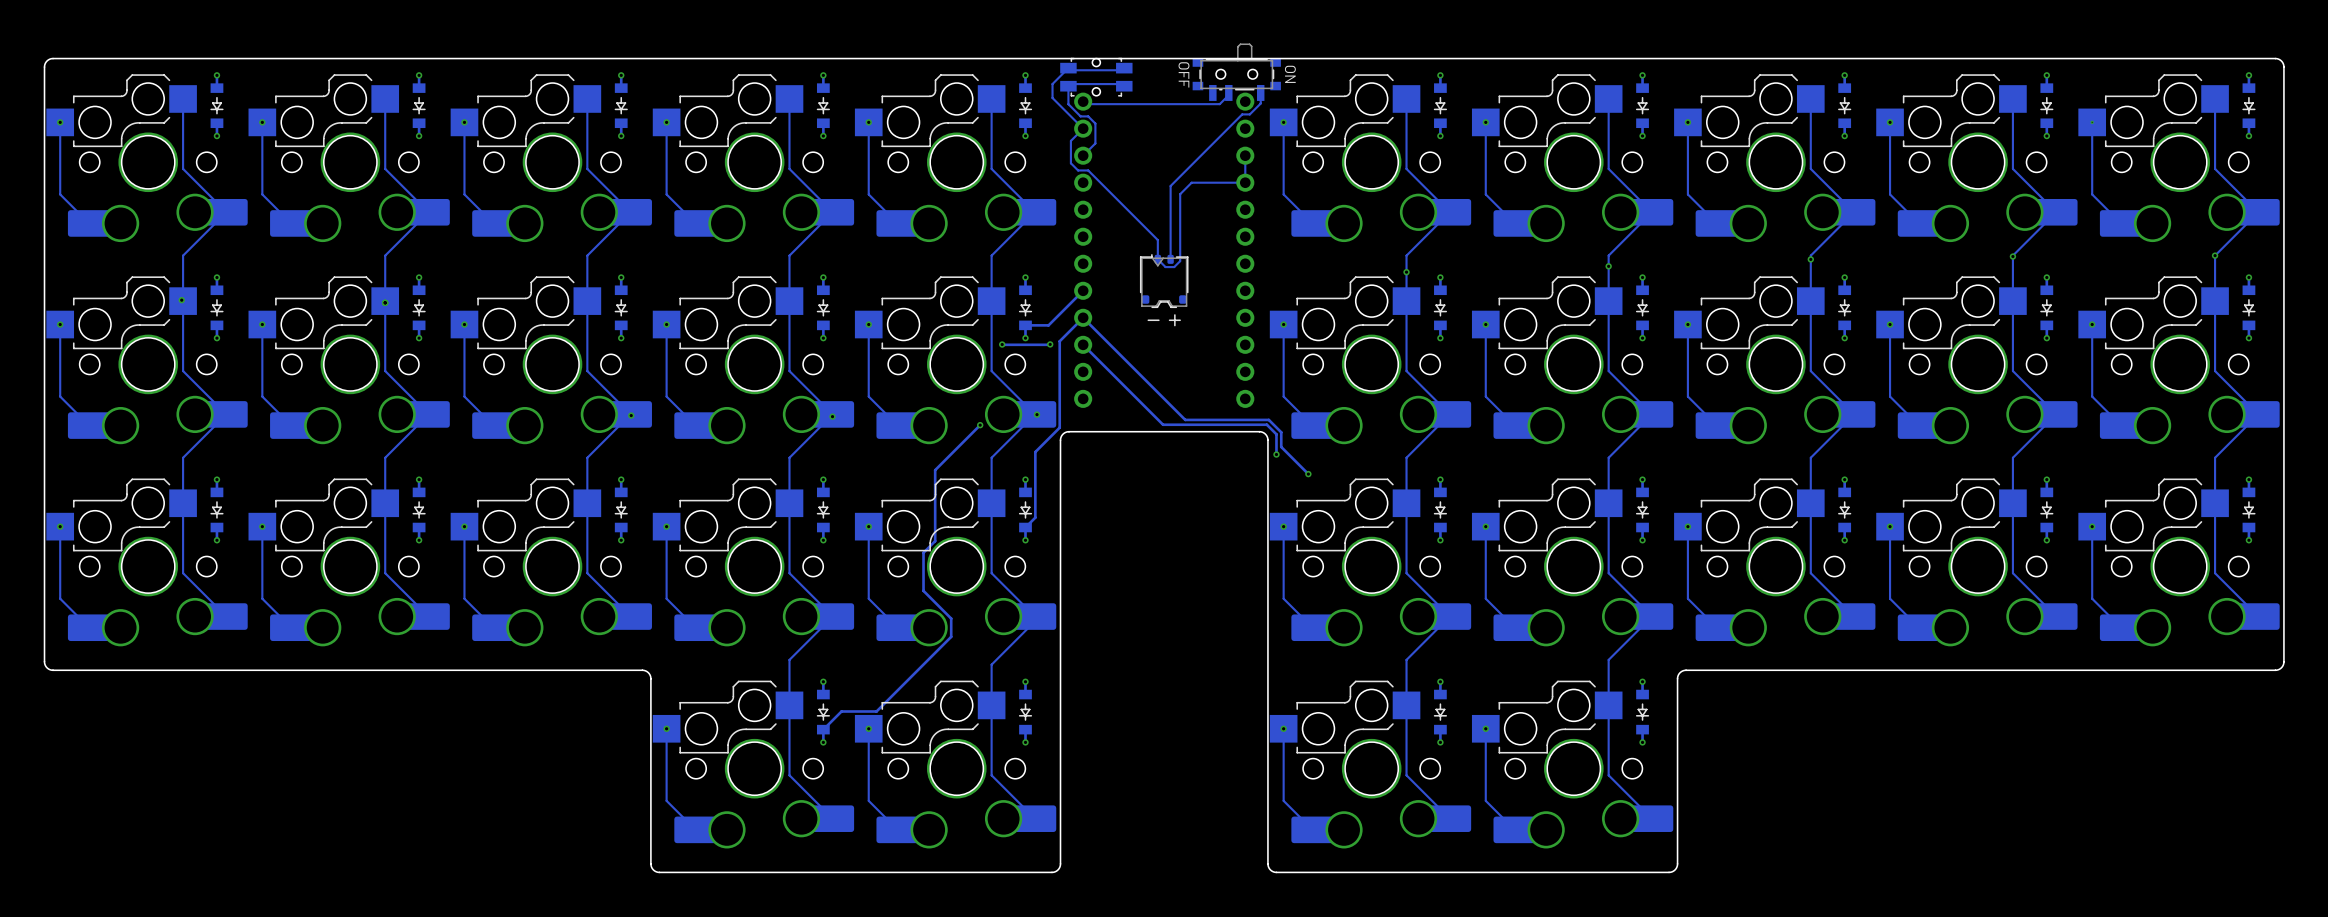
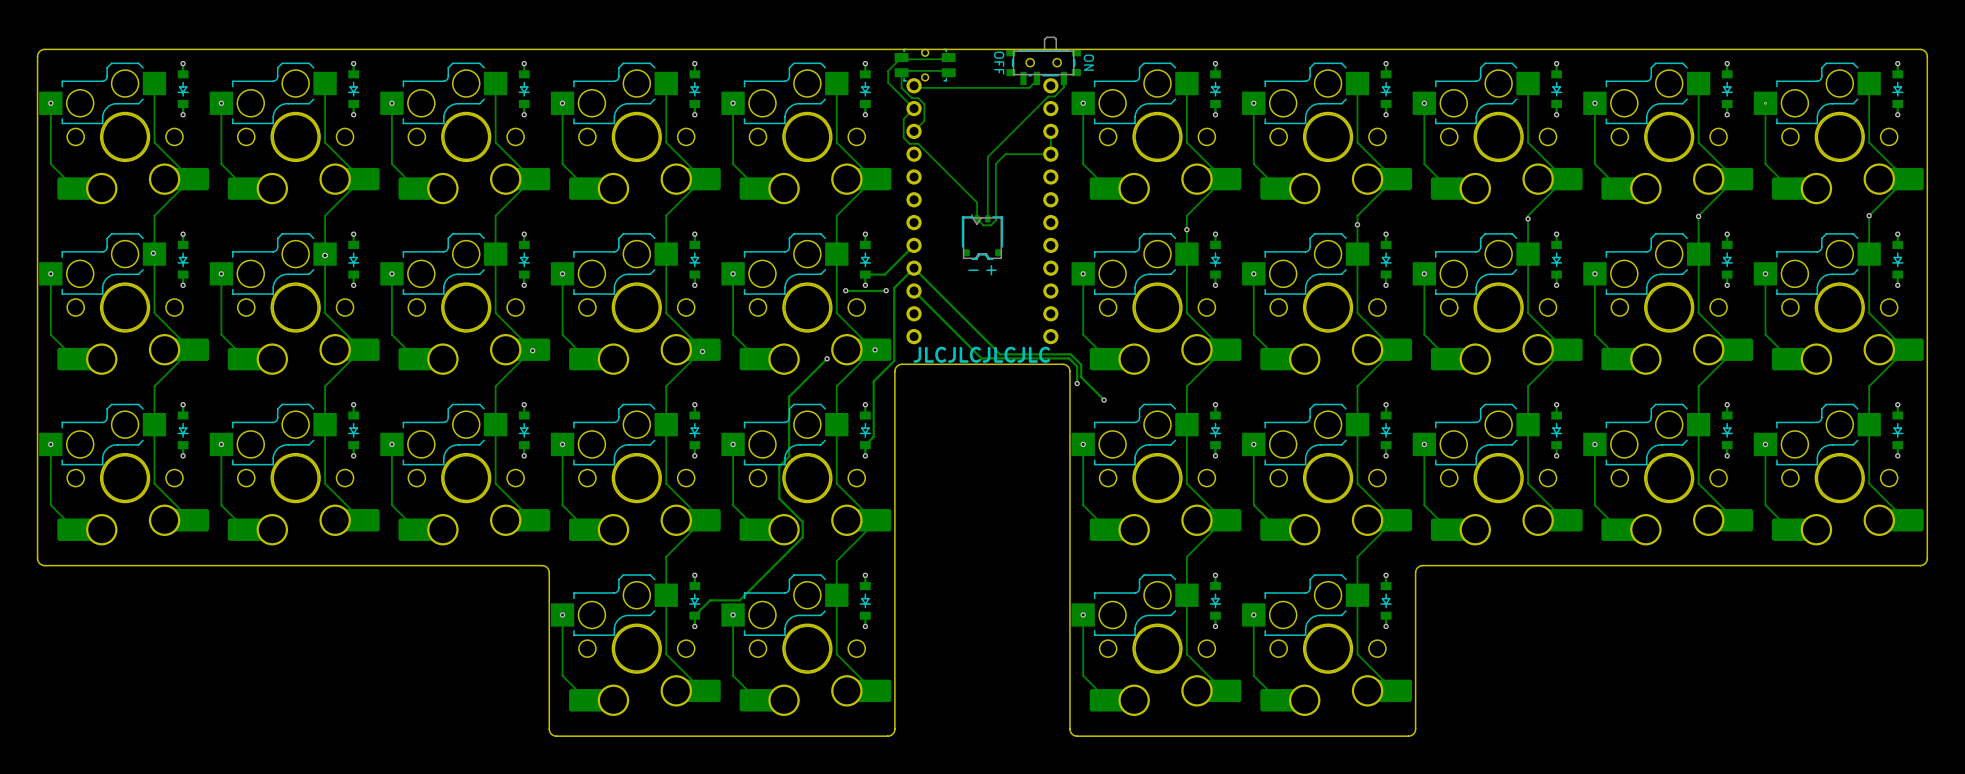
text: none -> JLCJLCJLCJLC (981, 354)

